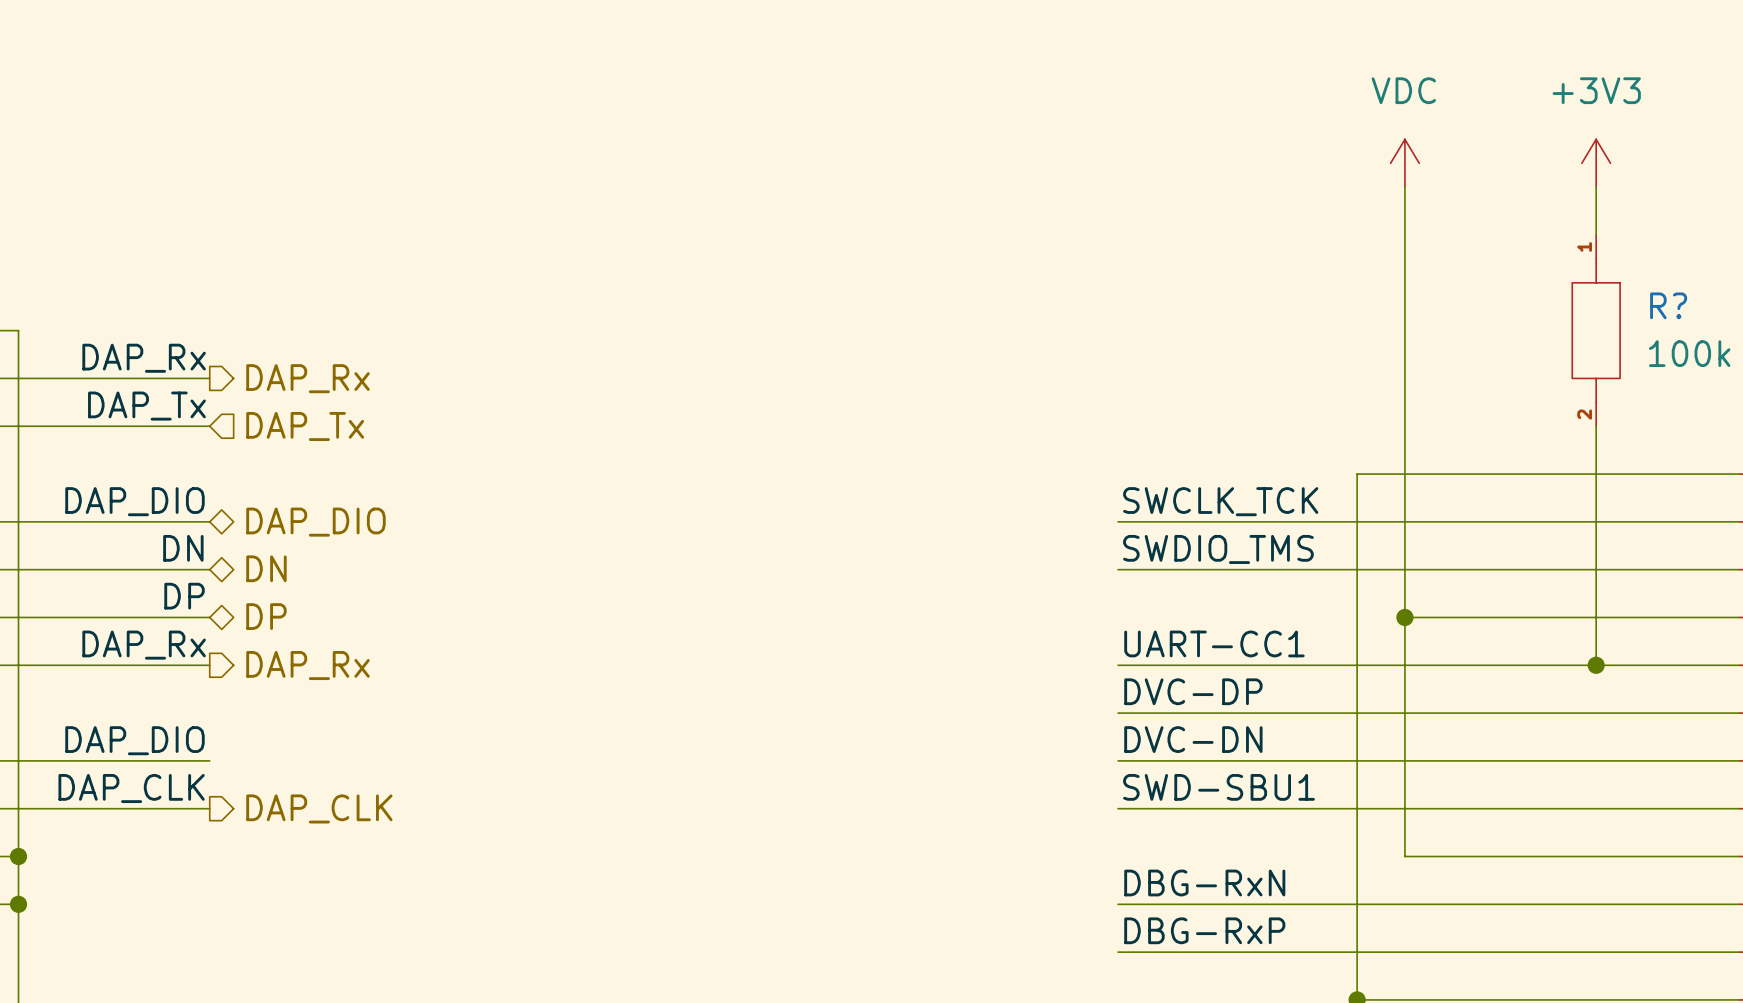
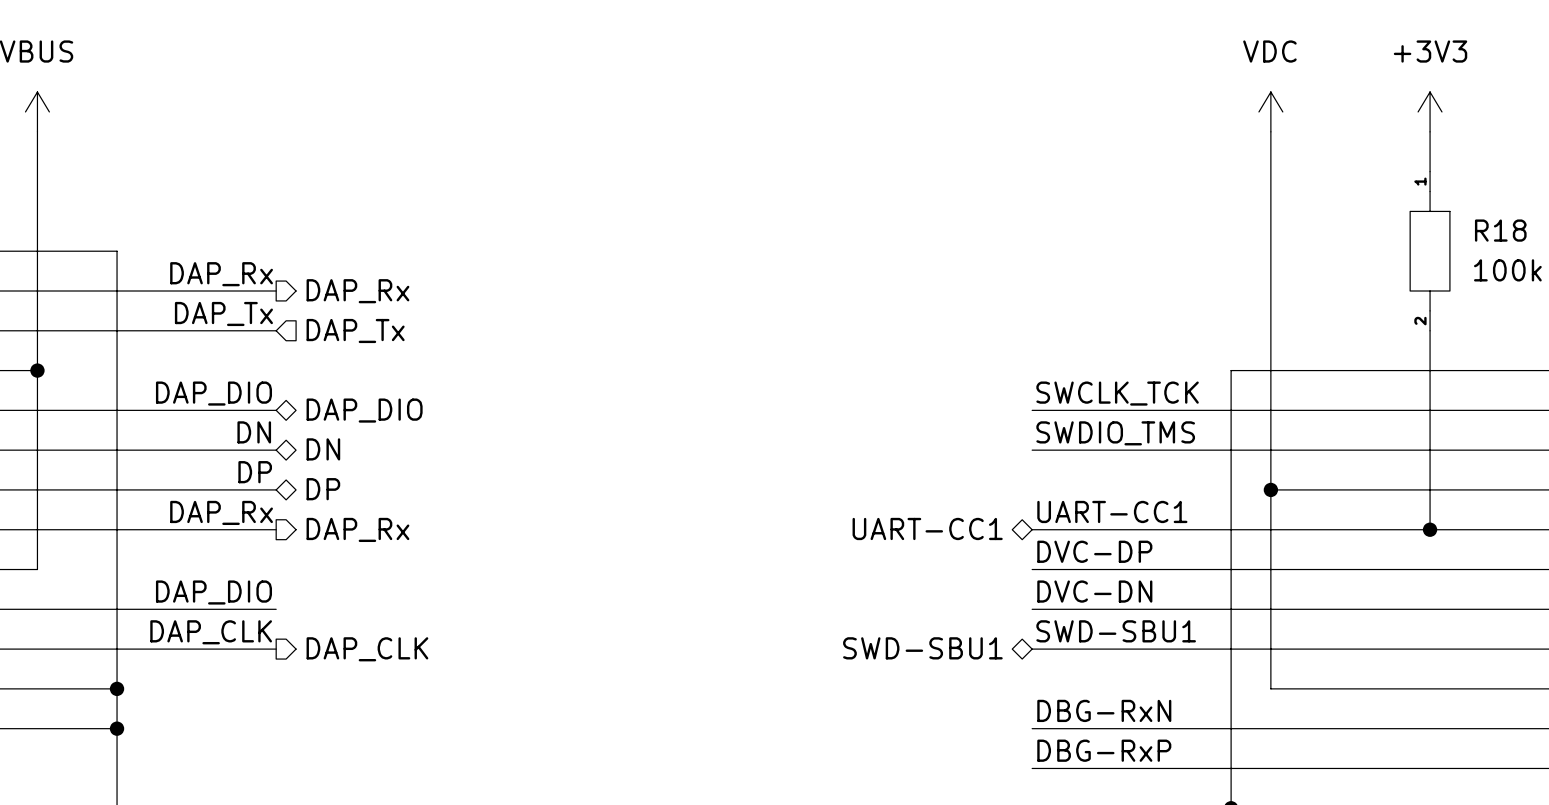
R? name: R? (1668, 305) -> R18 (1500, 230)
hierarchical label: none -> UART-CC1 (927, 528)
hierarchical label: none -> SWD-SBU1 (922, 648)

